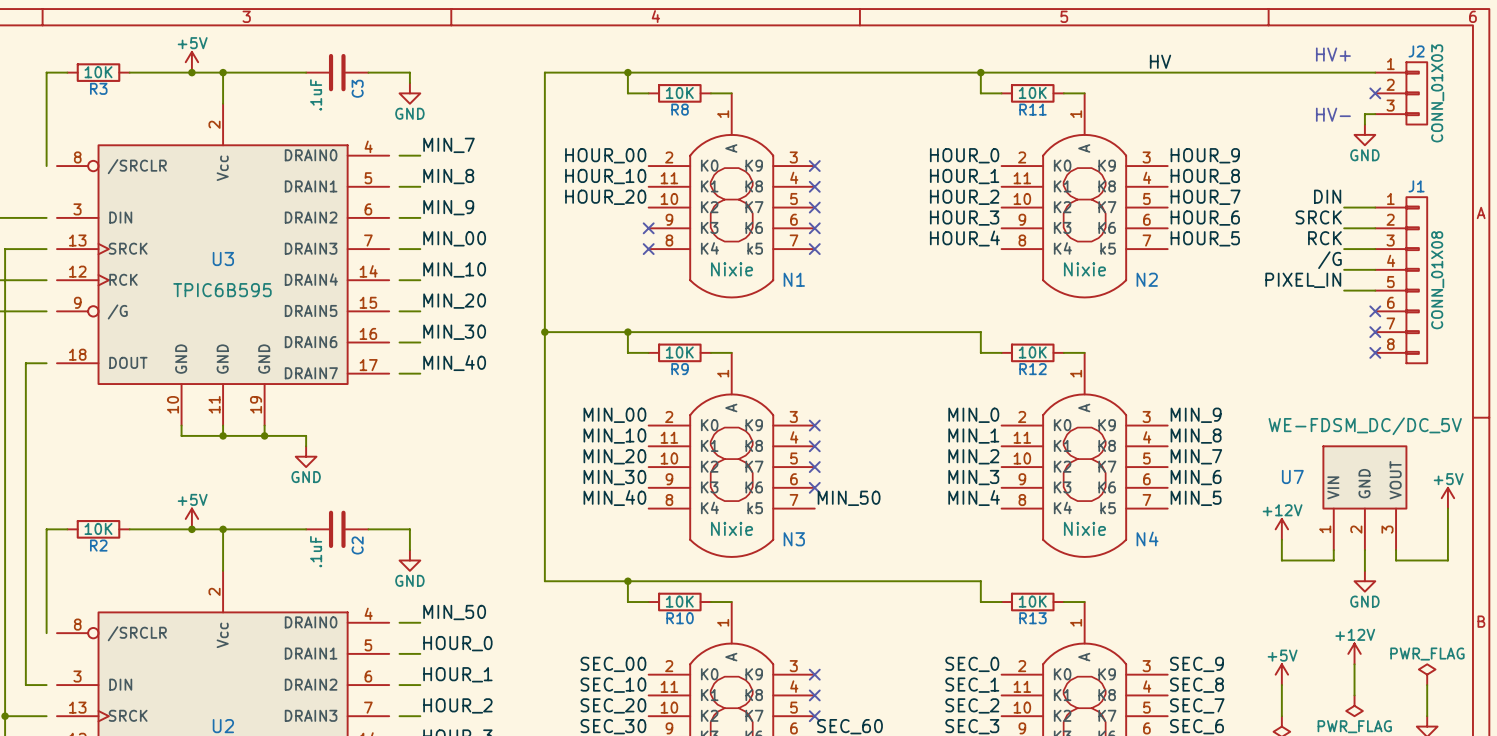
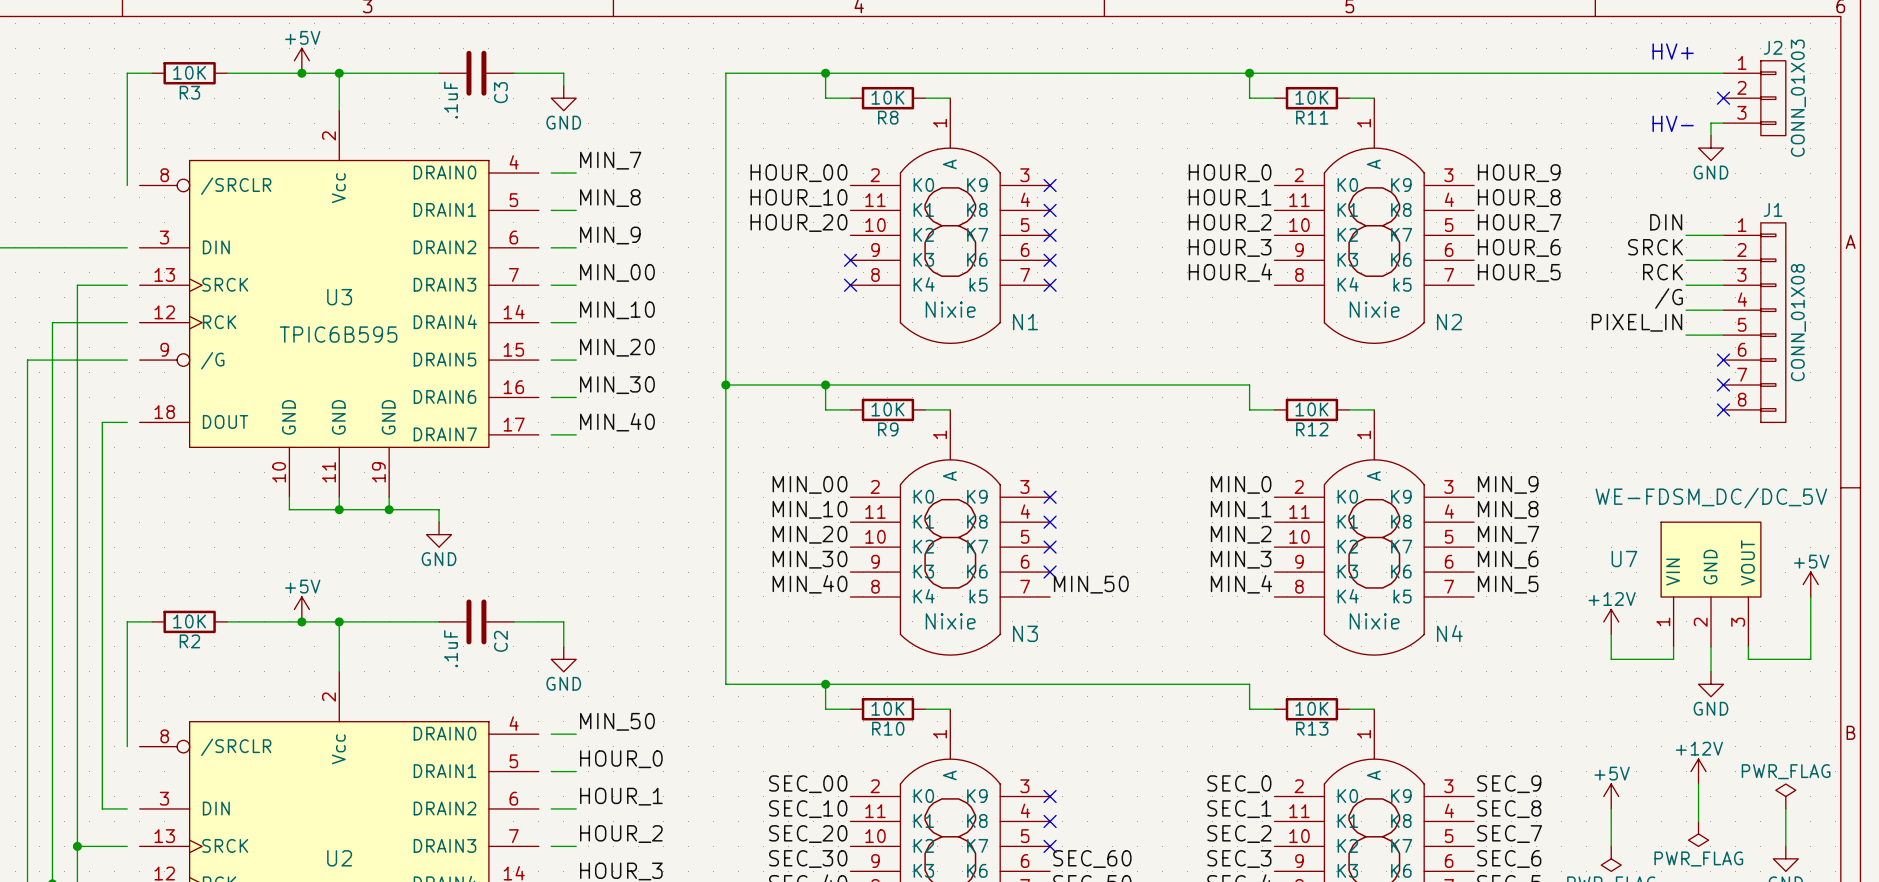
label: HV (1160, 61) -> none

